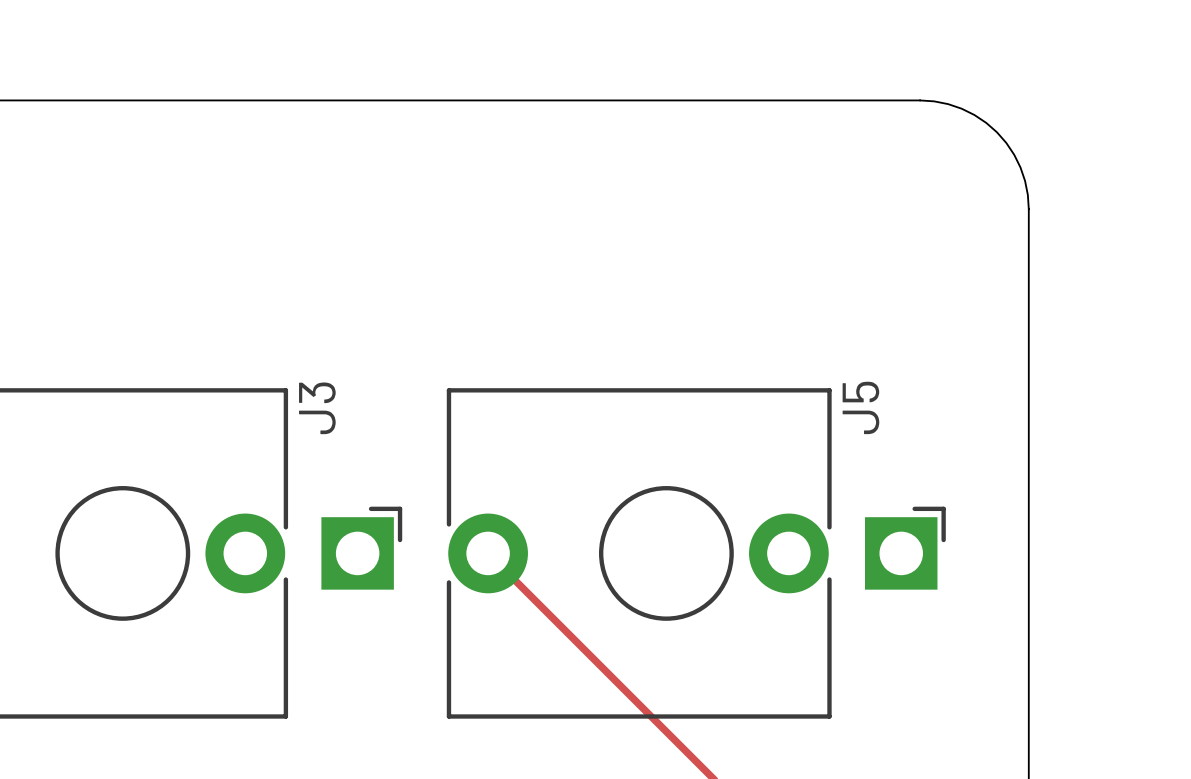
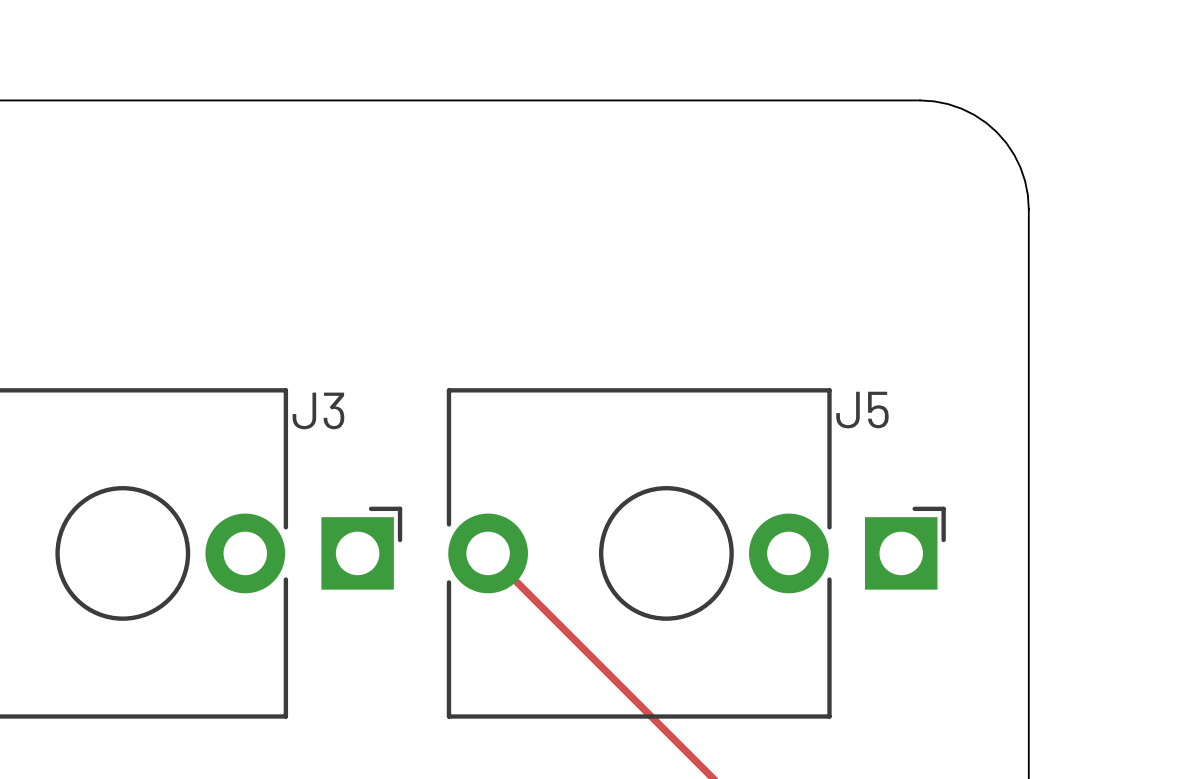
J5 name rotation: 0° (860, 407) -> 90° clockwise (862, 410)
J3 name rotation: 0° (317, 408) -> 90° clockwise (318, 410)

